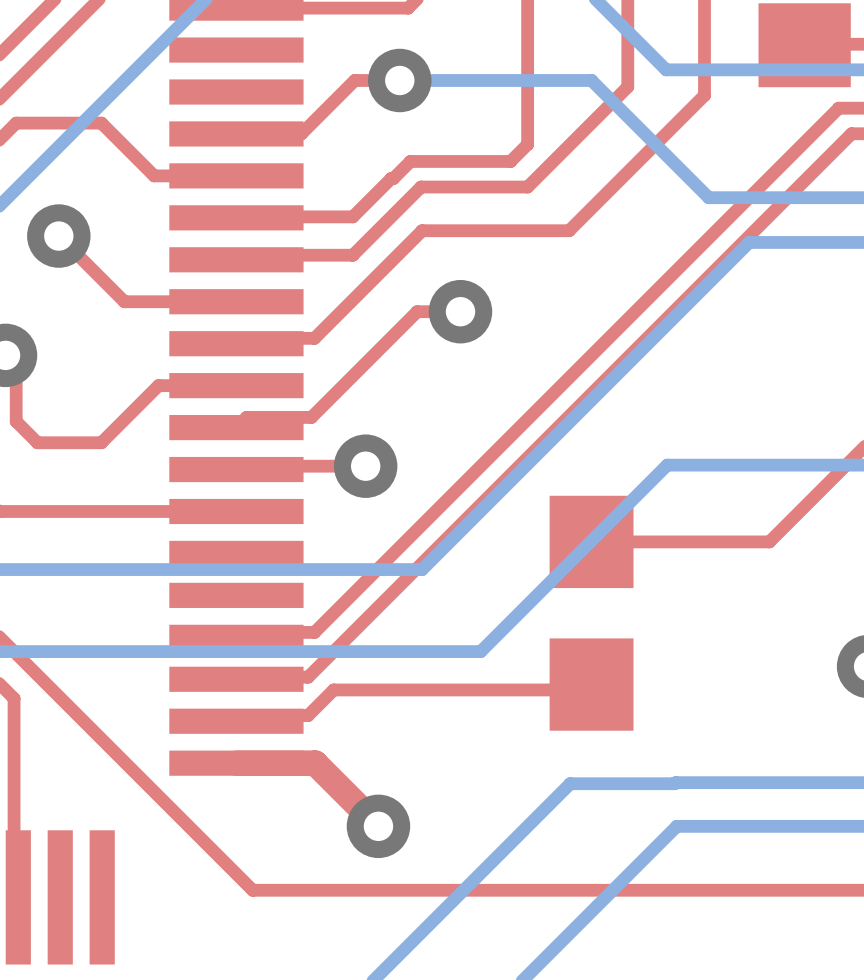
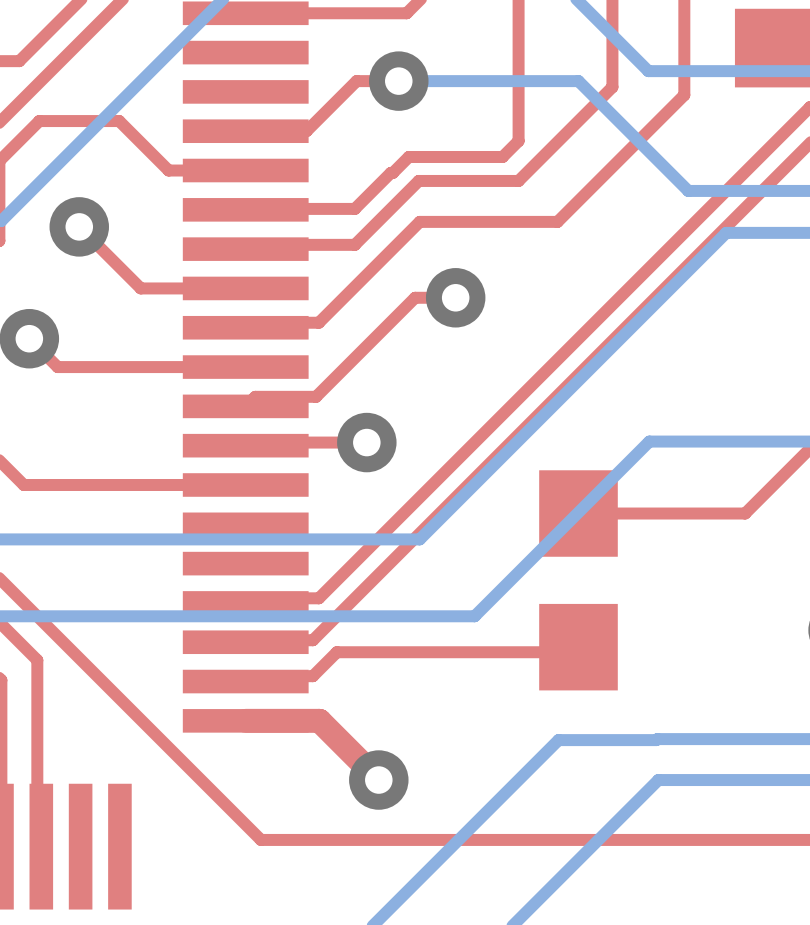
top track: (16, 366) (16, 421) (37, 442) (101, 442) (158, 385) -> (39, 348) (57, 367) (172, 367)

